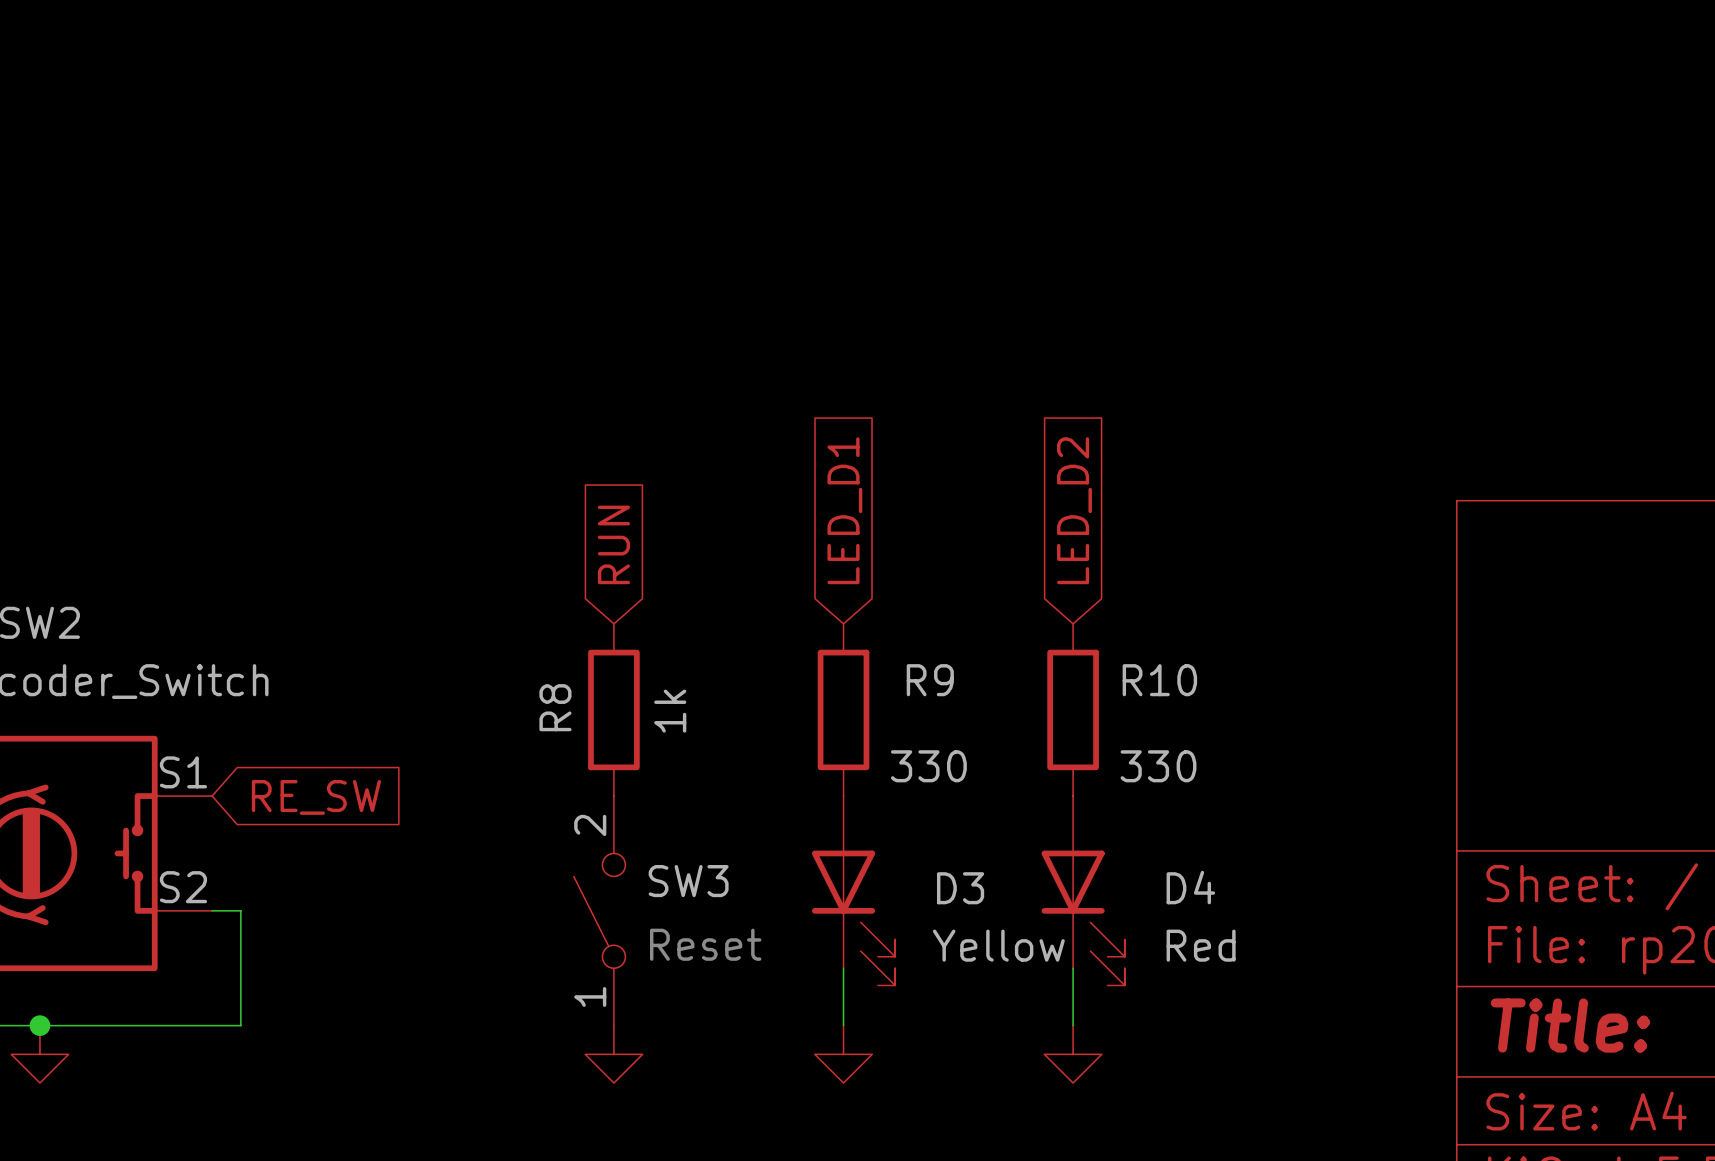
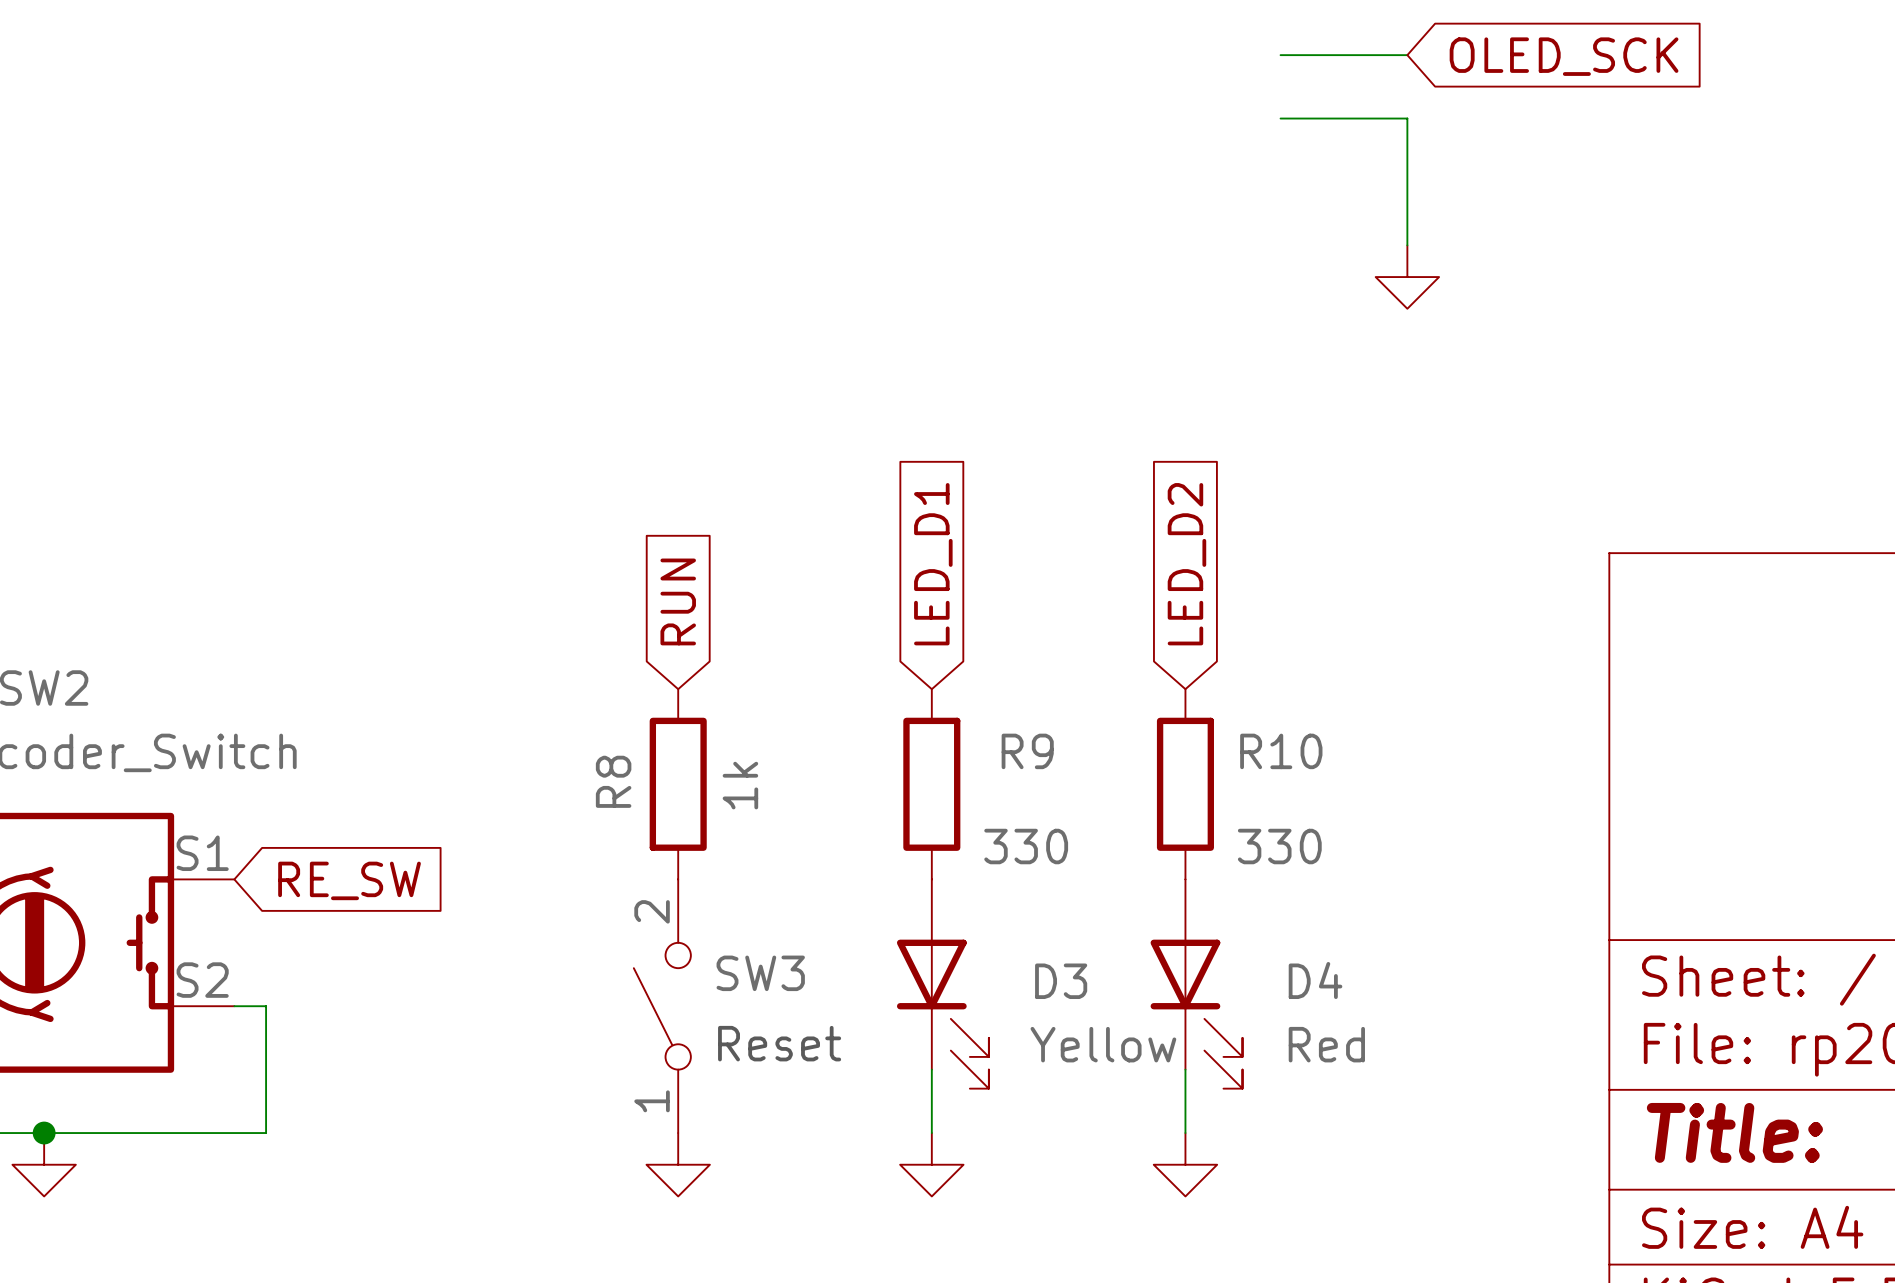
wire: none -> (1280, 55) (1407, 55)
global label: none -> OLED_SCK (1564, 56)
wire: none -> (1280, 118) (1407, 118) (1407, 245)
power symbol: none -> (1407, 277)

